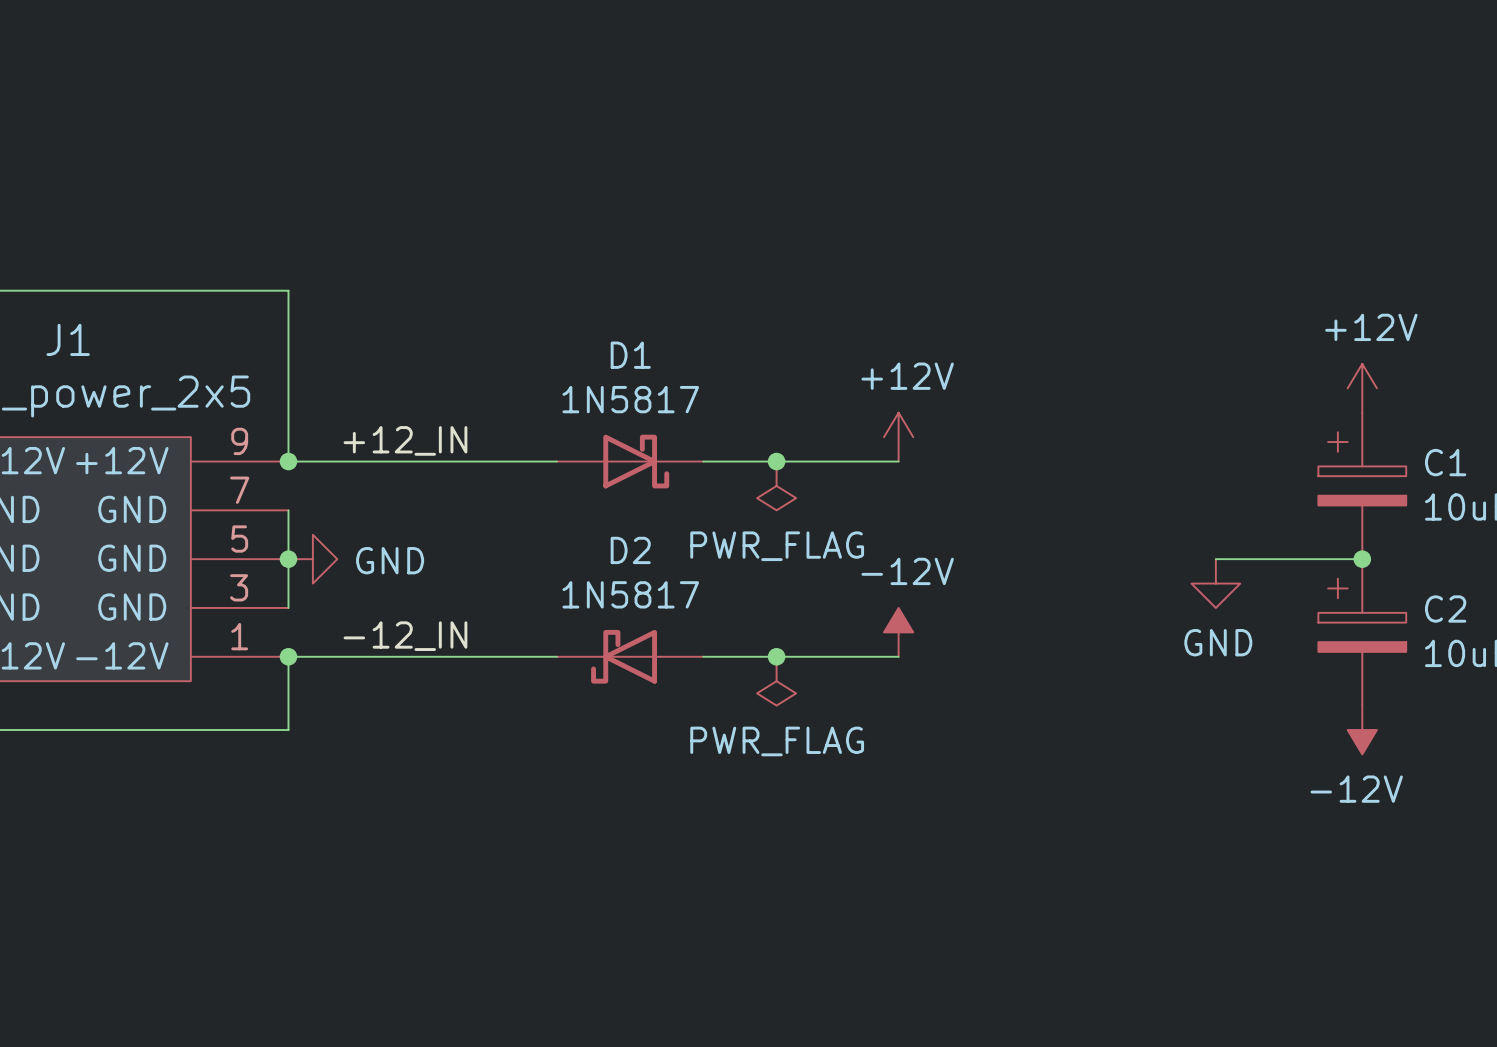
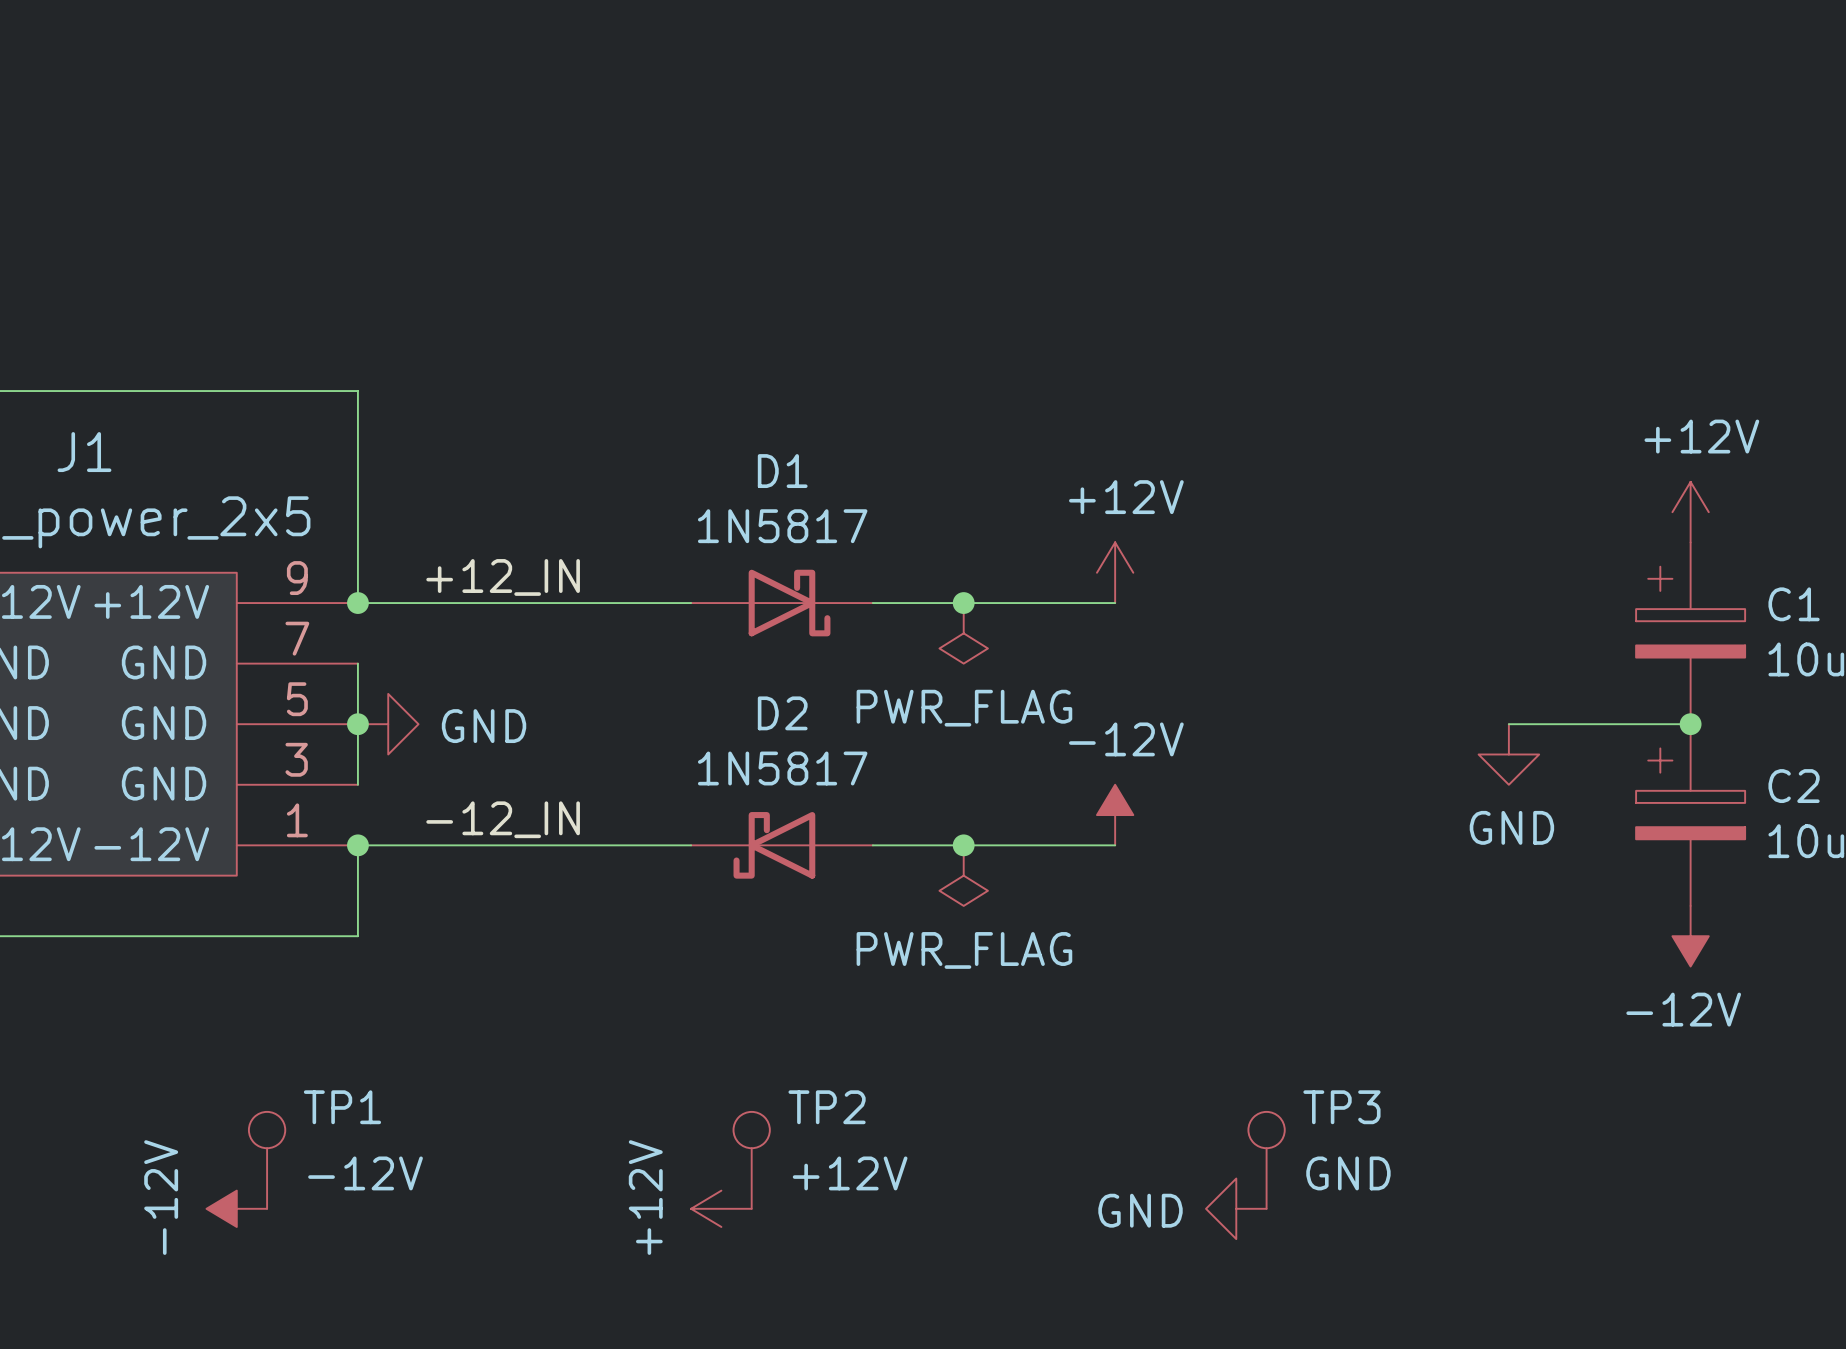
TP1: none -> -12V (267, 1160)
TP2: none -> +12V (751, 1160)
TP3: none -> GND (1266, 1160)
power symbol: none -> -12V (236, 1208)
power symbol: none -> +12V (721, 1208)
power symbol: none -> GND (1236, 1208)

